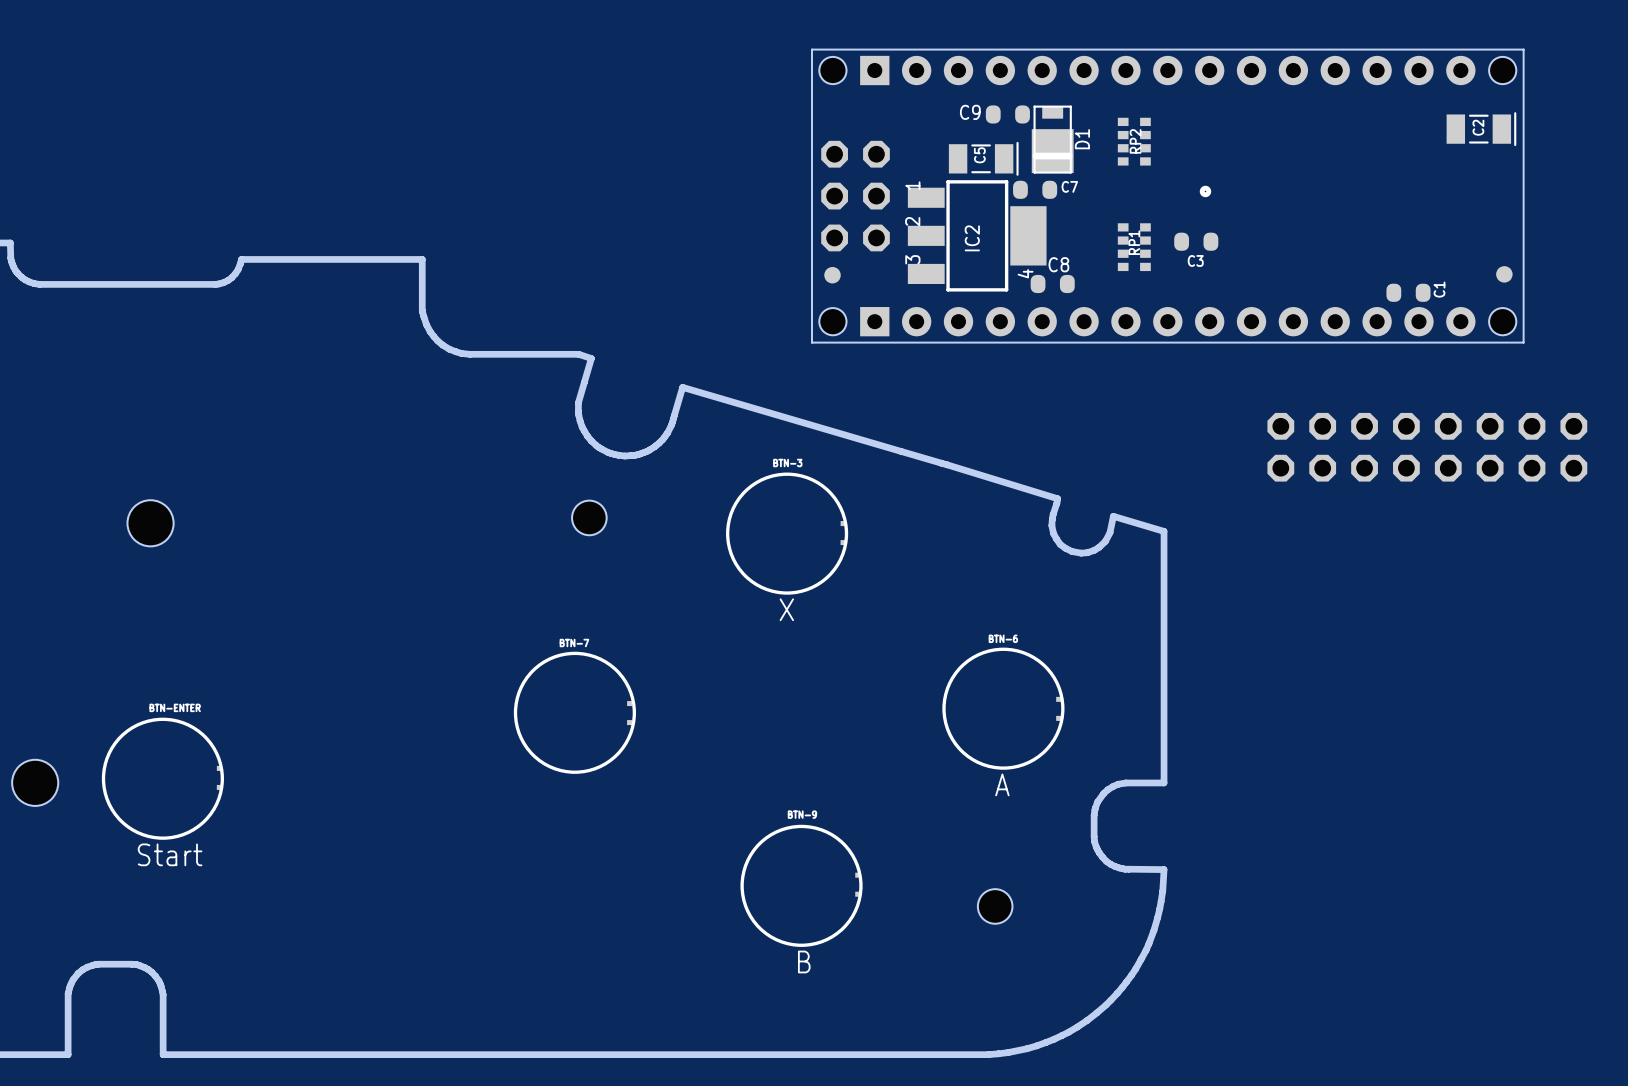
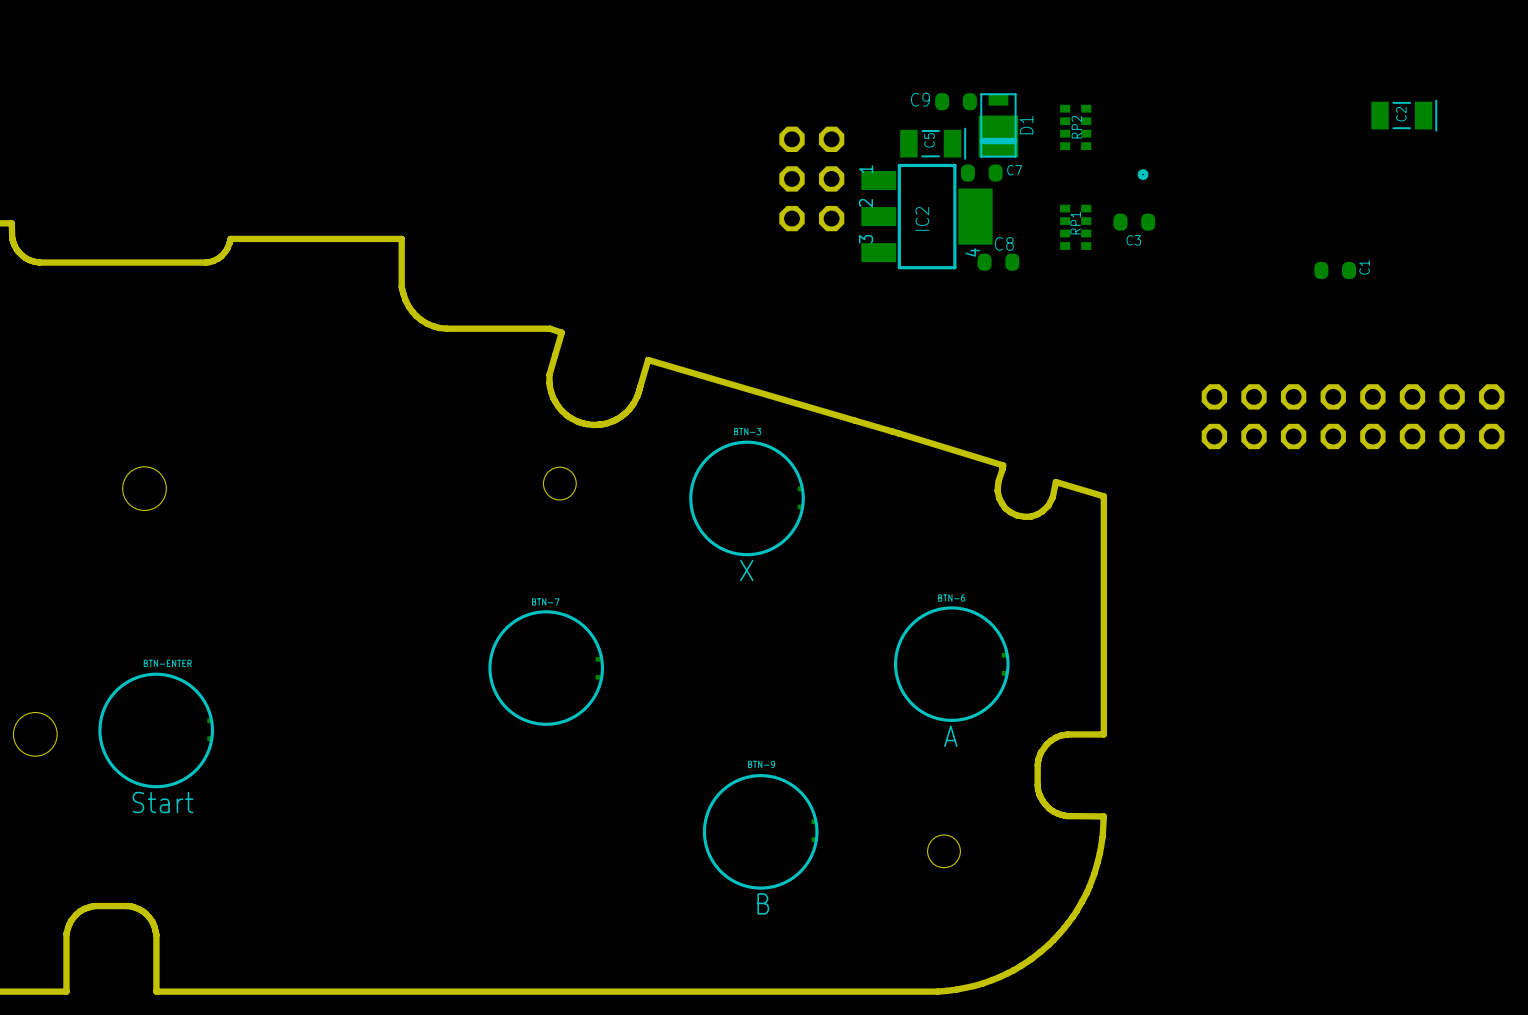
board edge: (1523, 49) (1523, 342) (811, 342) (811, 49) (1523, 49) -> none
hole: (832, 70) -> none
part: (1167, 70) -> none
hole: (1502, 70) -> none
part: (1504, 274) -> none
part: (832, 275) -> none
hole: (832, 321) -> none
part: (1167, 321) -> none
hole: (1502, 321) -> none

